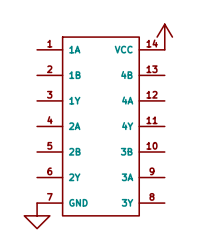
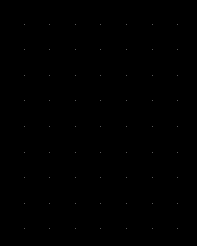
power symbol: (164, 37) -> none
part: (100, 126) -> none
power symbol: (37, 215) -> none

